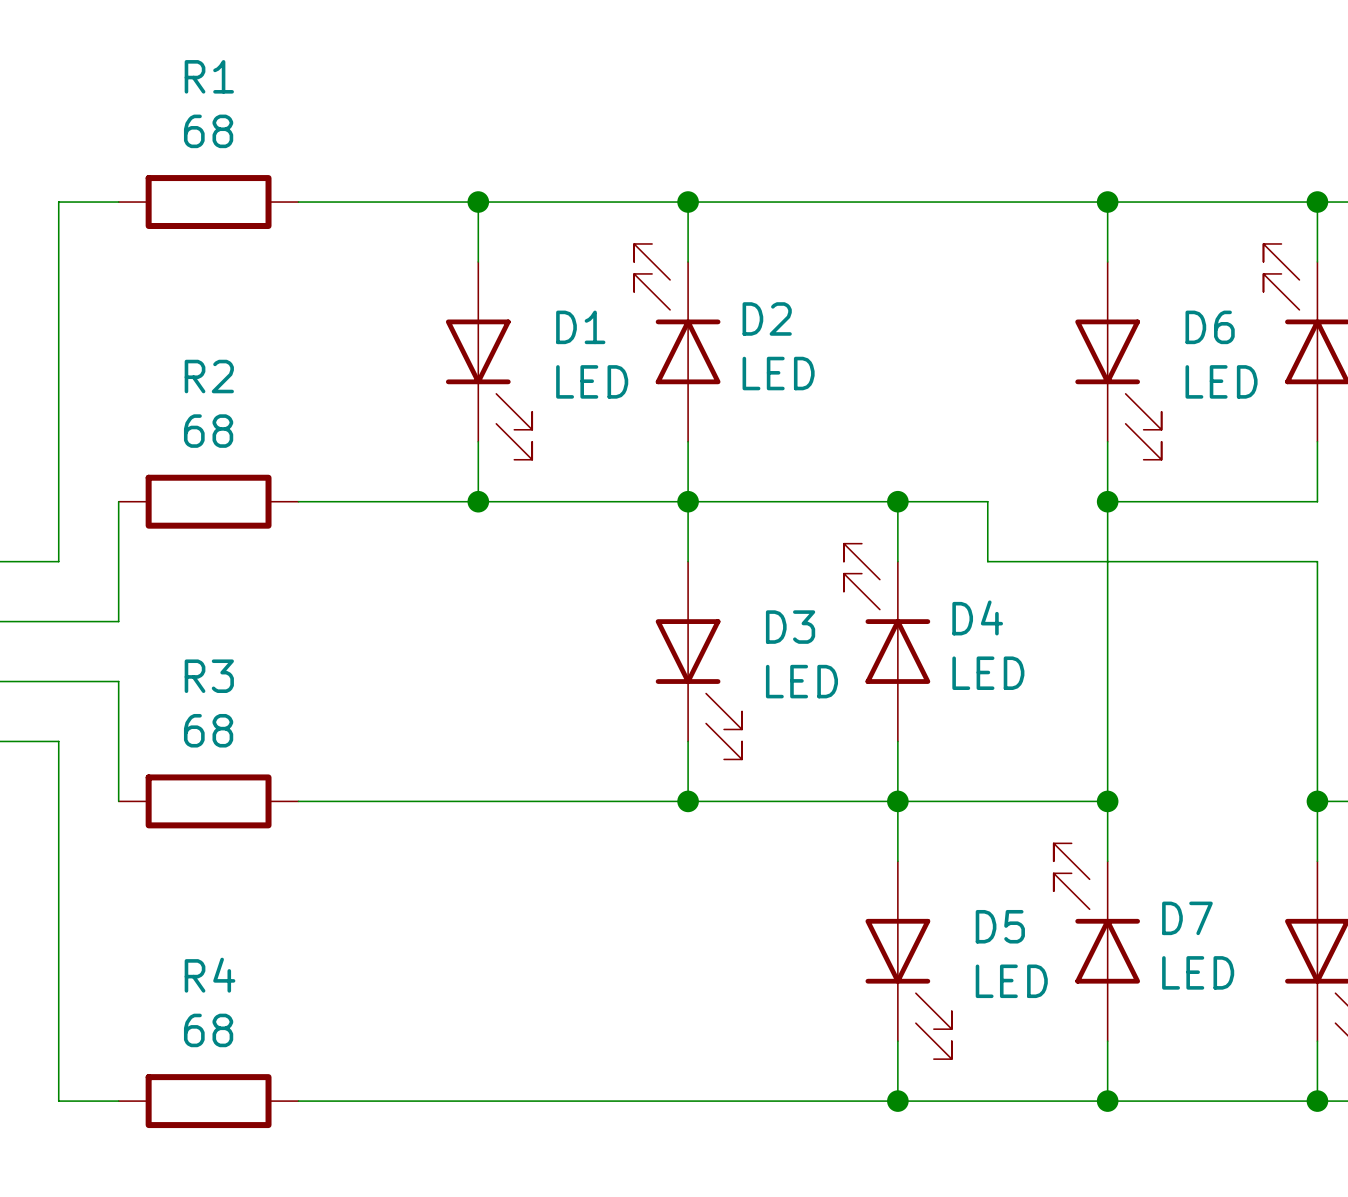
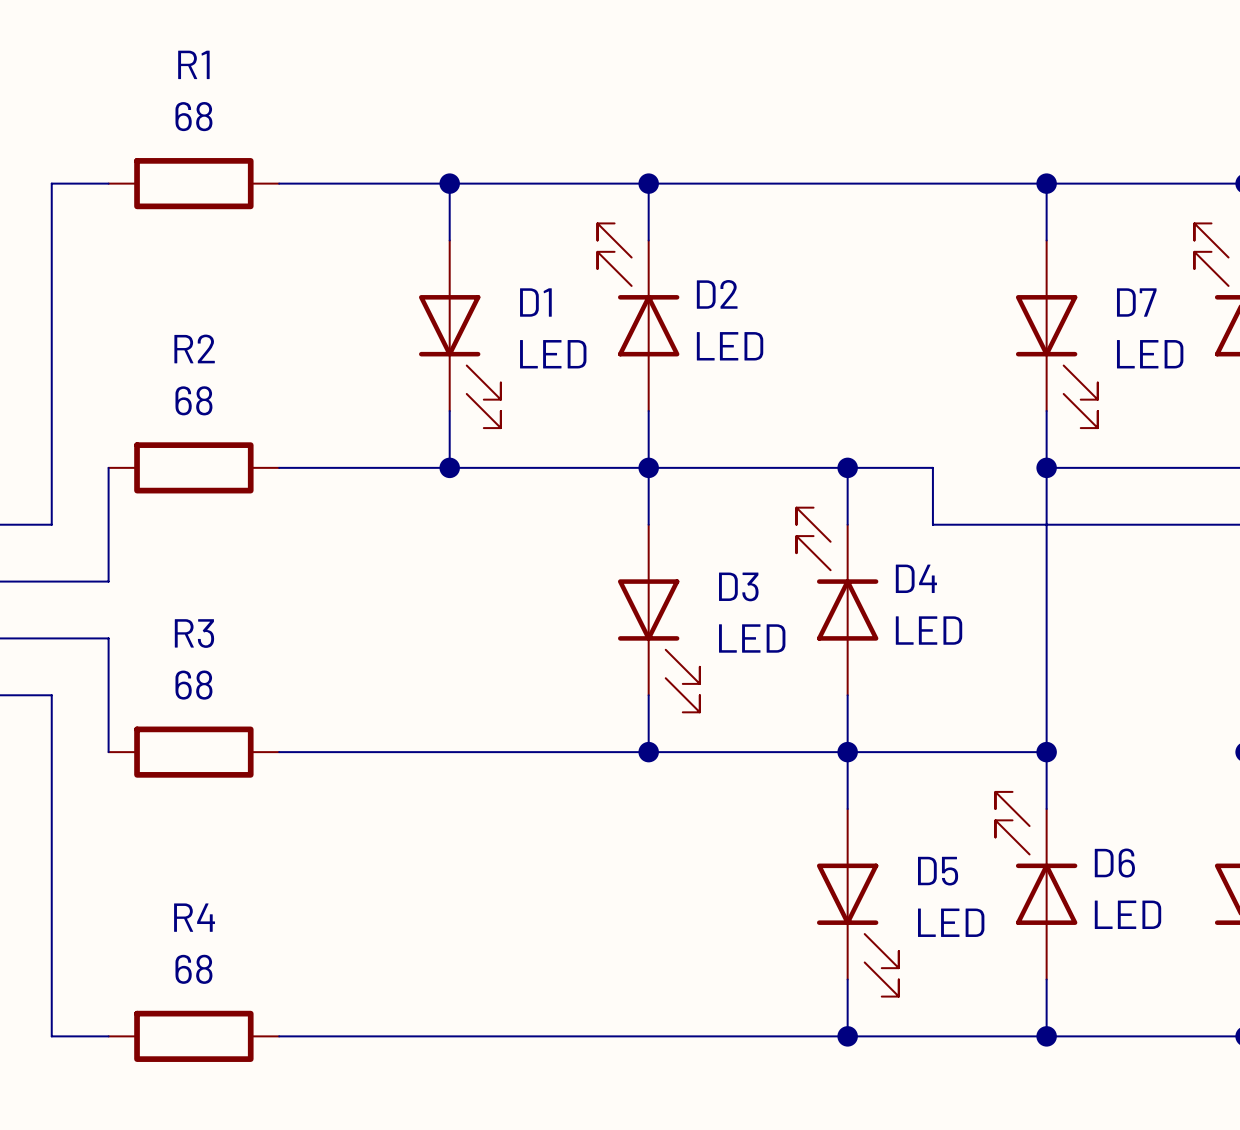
D6 name: D6 (1210, 327) -> D7 (1136, 302)
D7 name: D7 (1187, 918) -> D6 (1114, 863)

